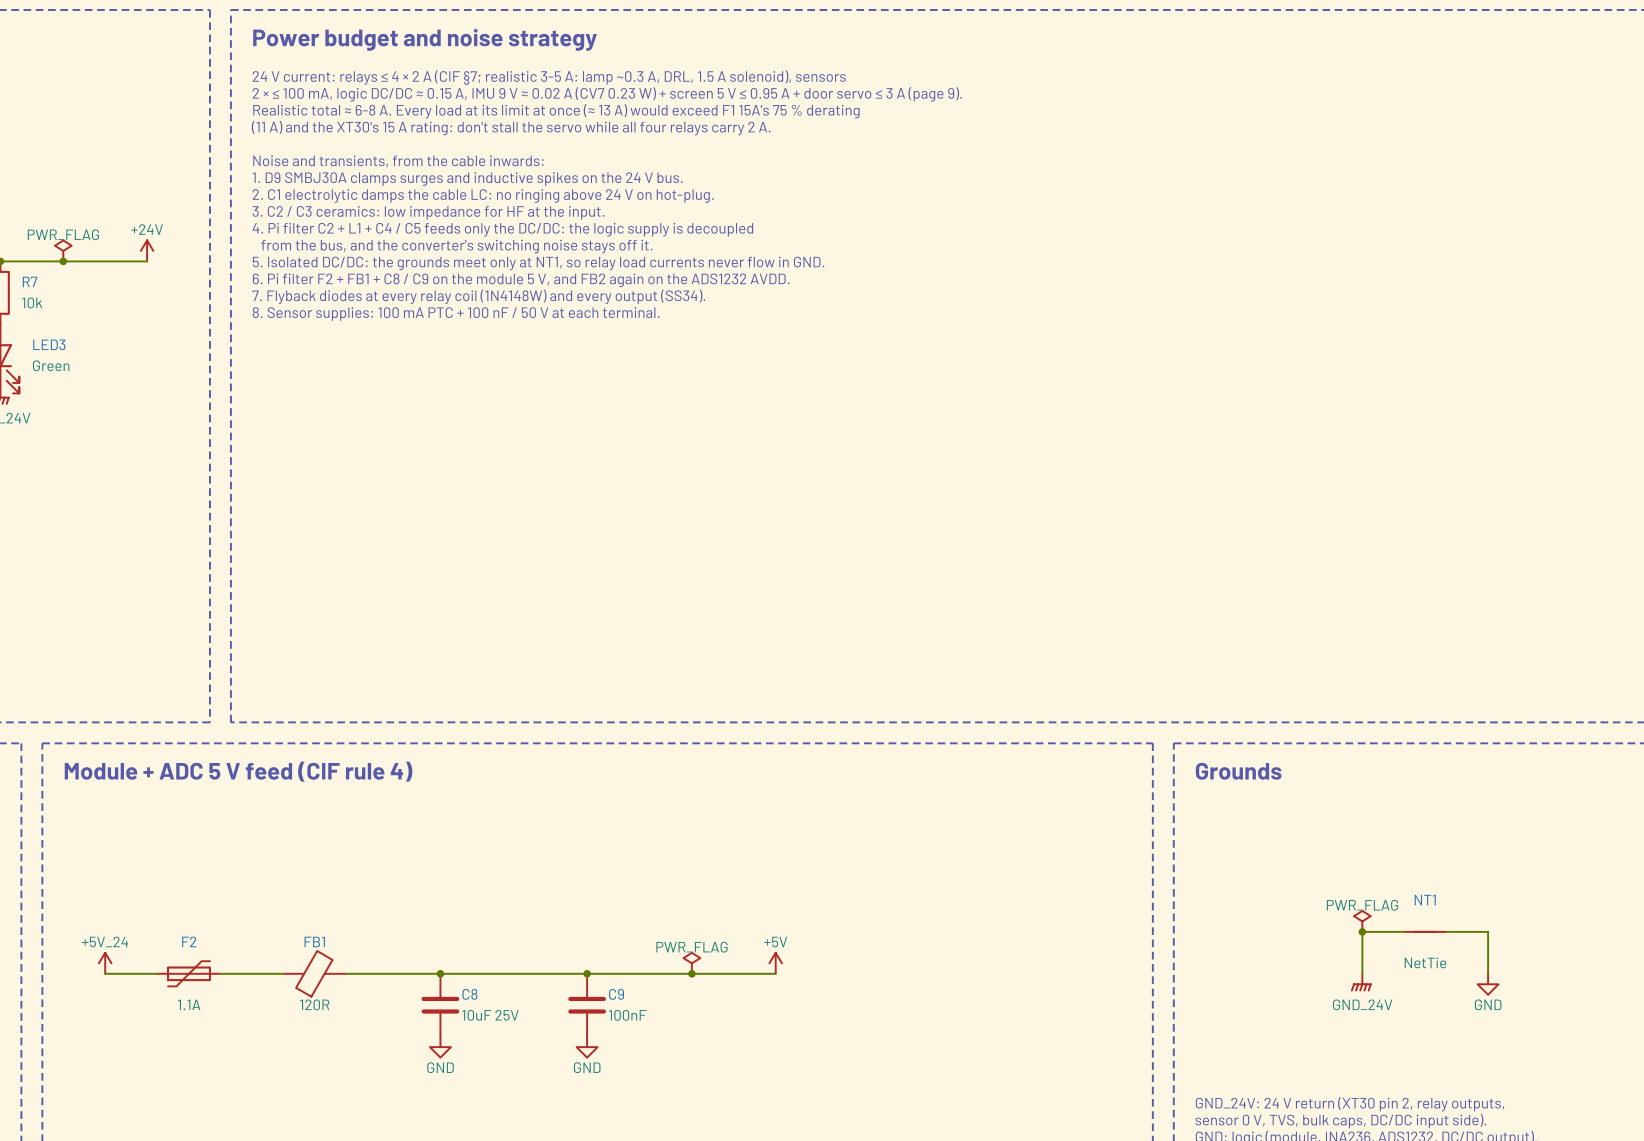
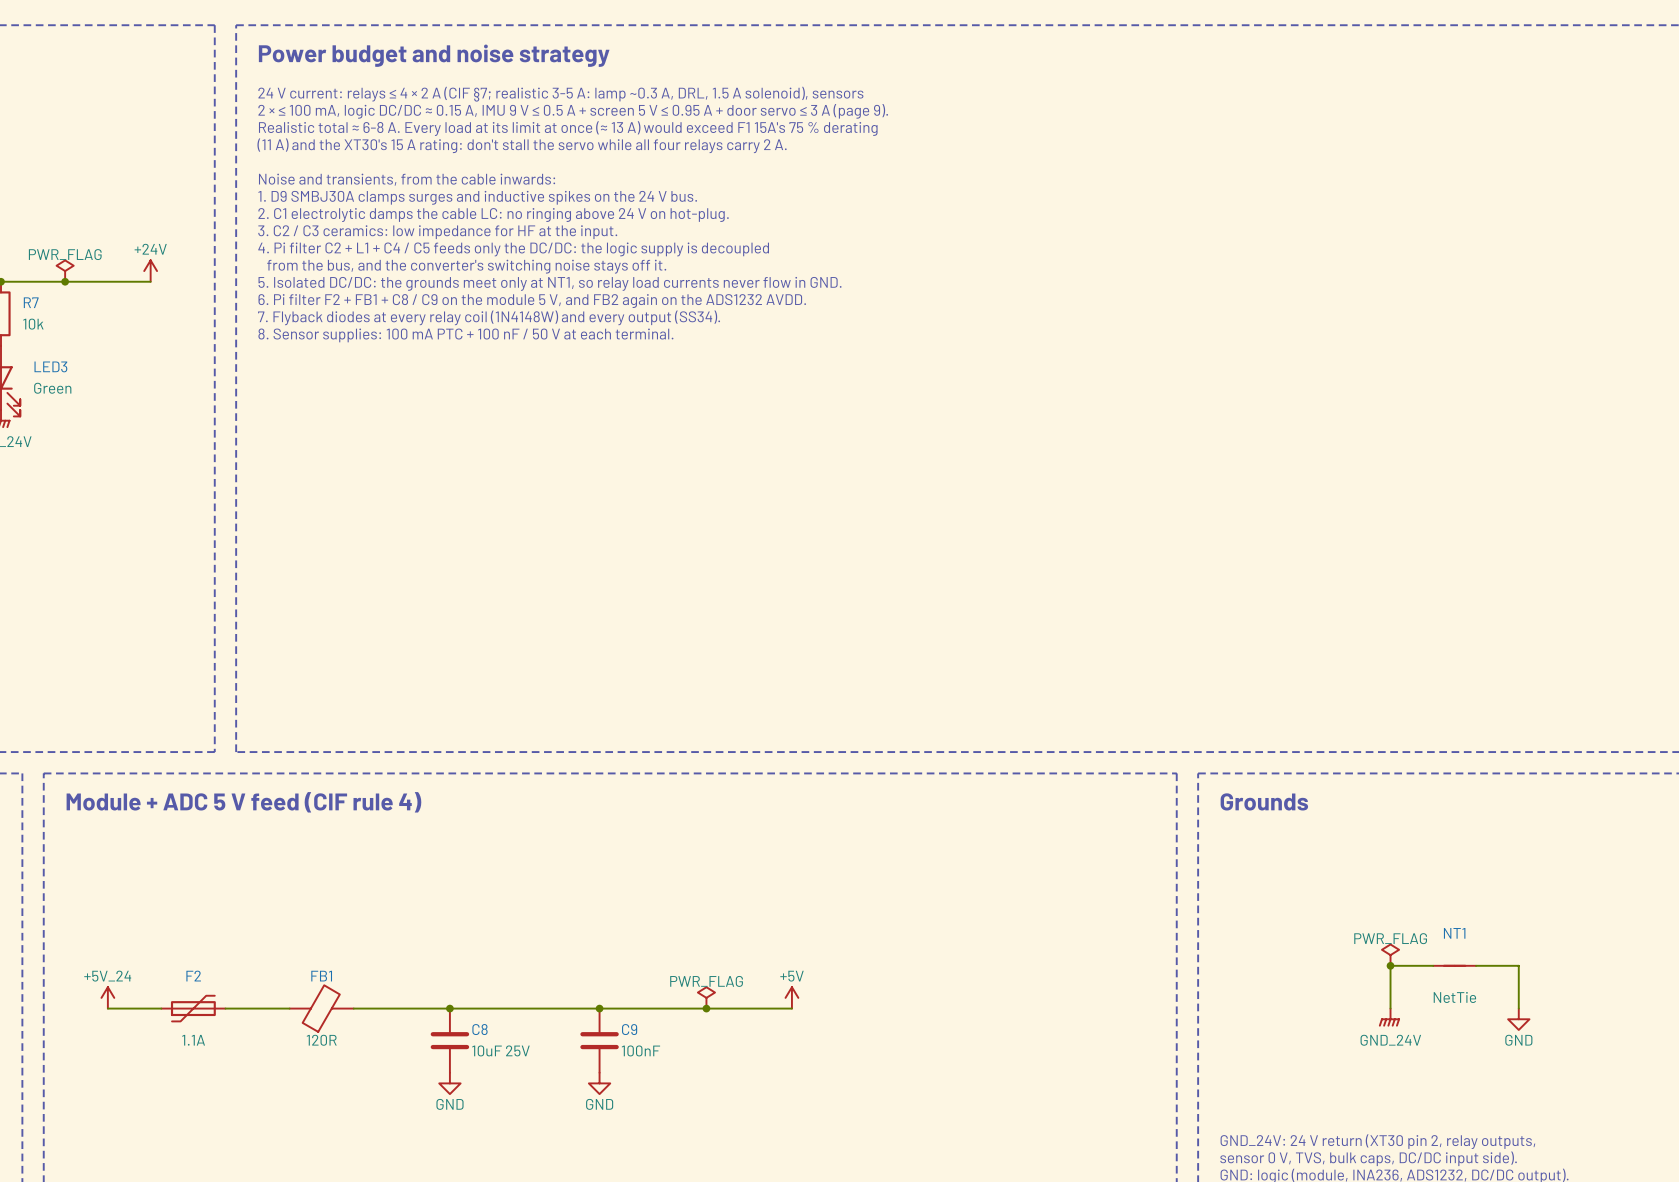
text: 2 × ≤ 100 mA, logic DC/DC ≈ 0.15 A, IMU 9 V ≈ 0.02 A (CV7 0.23 W) + screen 5 V ≤ 0.95 A + door servo ≤ 3 A (page 9). (607, 94) -> 2 × ≤ 100 mA, logic DC/DC ≈ 0.15 A, IMU 9 V ≤ 0.5 A + screen 5 V ≤ 0.95 A + door servo ≤ 3 A (page 9). (573, 111)

